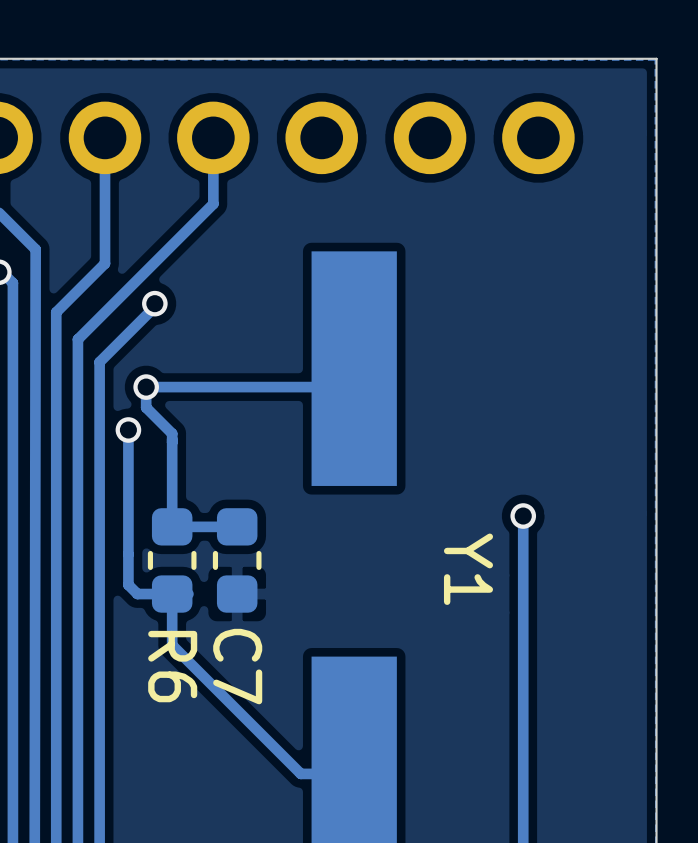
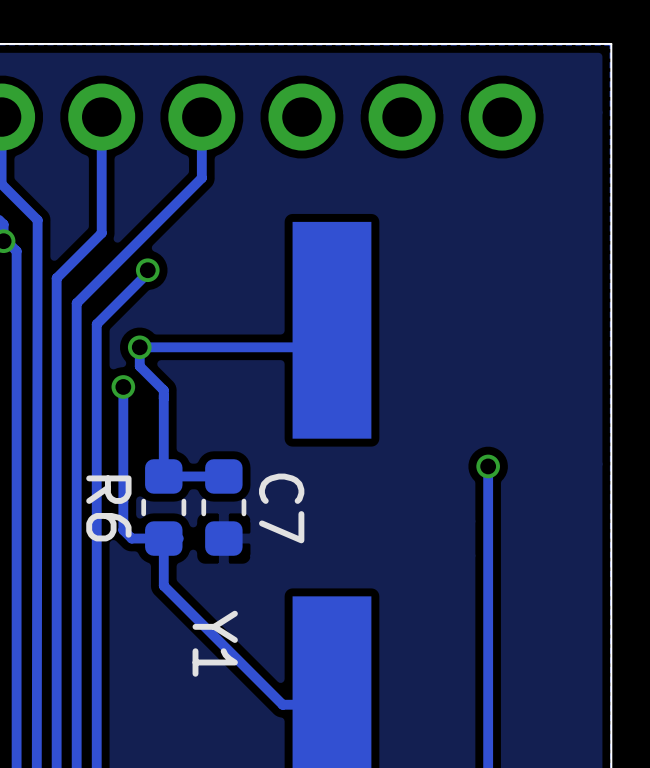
Y1 name position: Y1 (468, 569) -> Y1 (215, 643)
R6 name position: R6 (172, 666) -> R6 (108, 508)
C7 name position: C7 (237, 666) -> C7 (281, 508)

